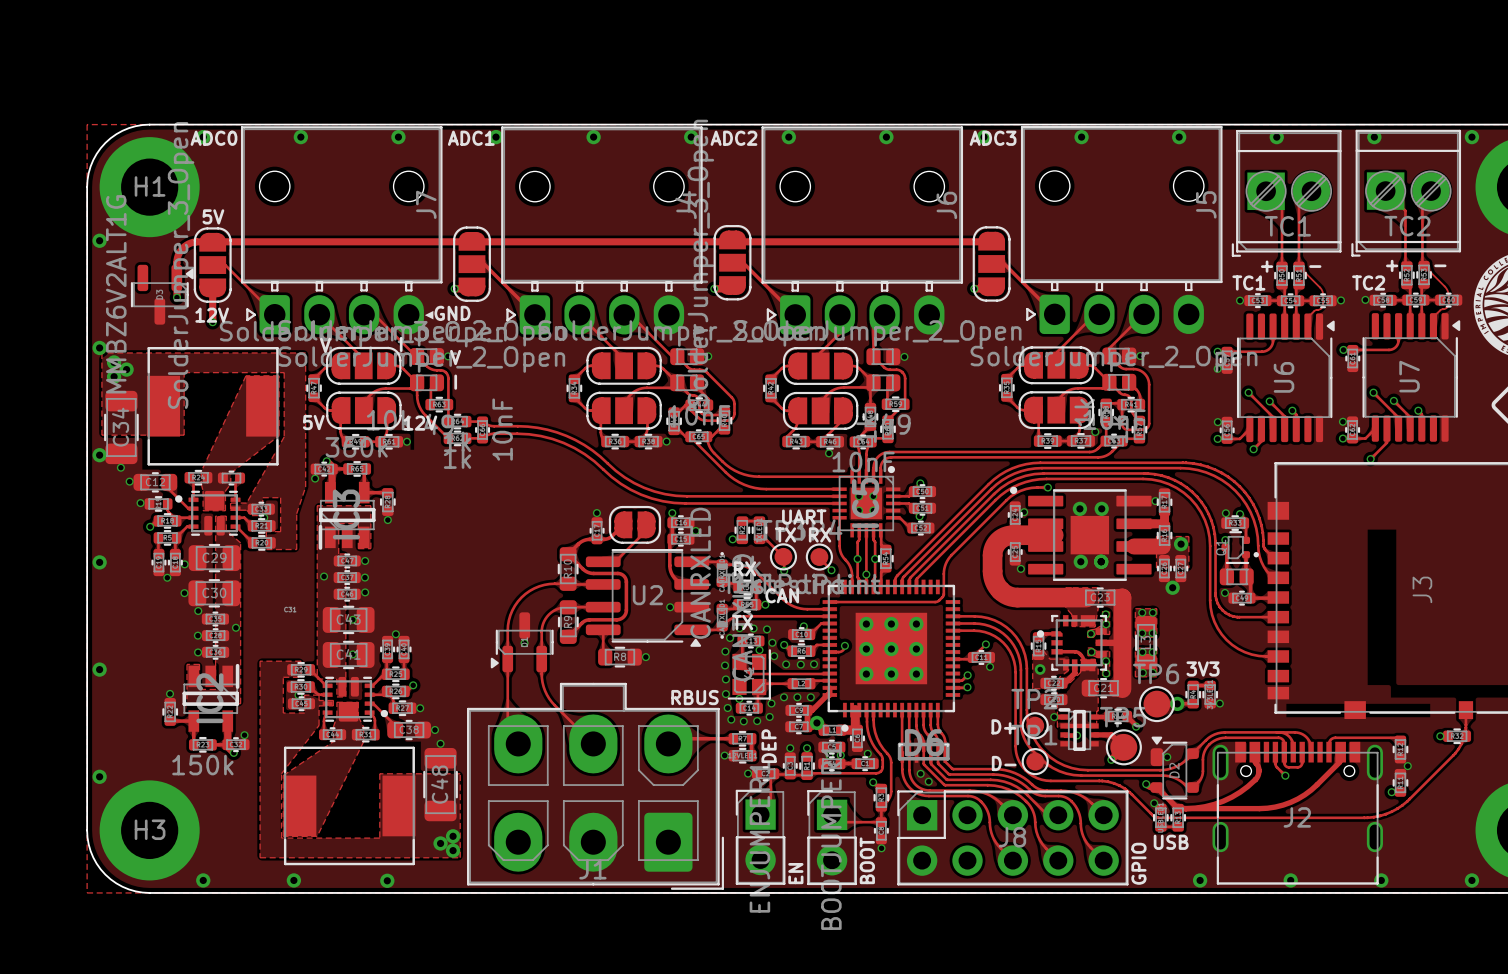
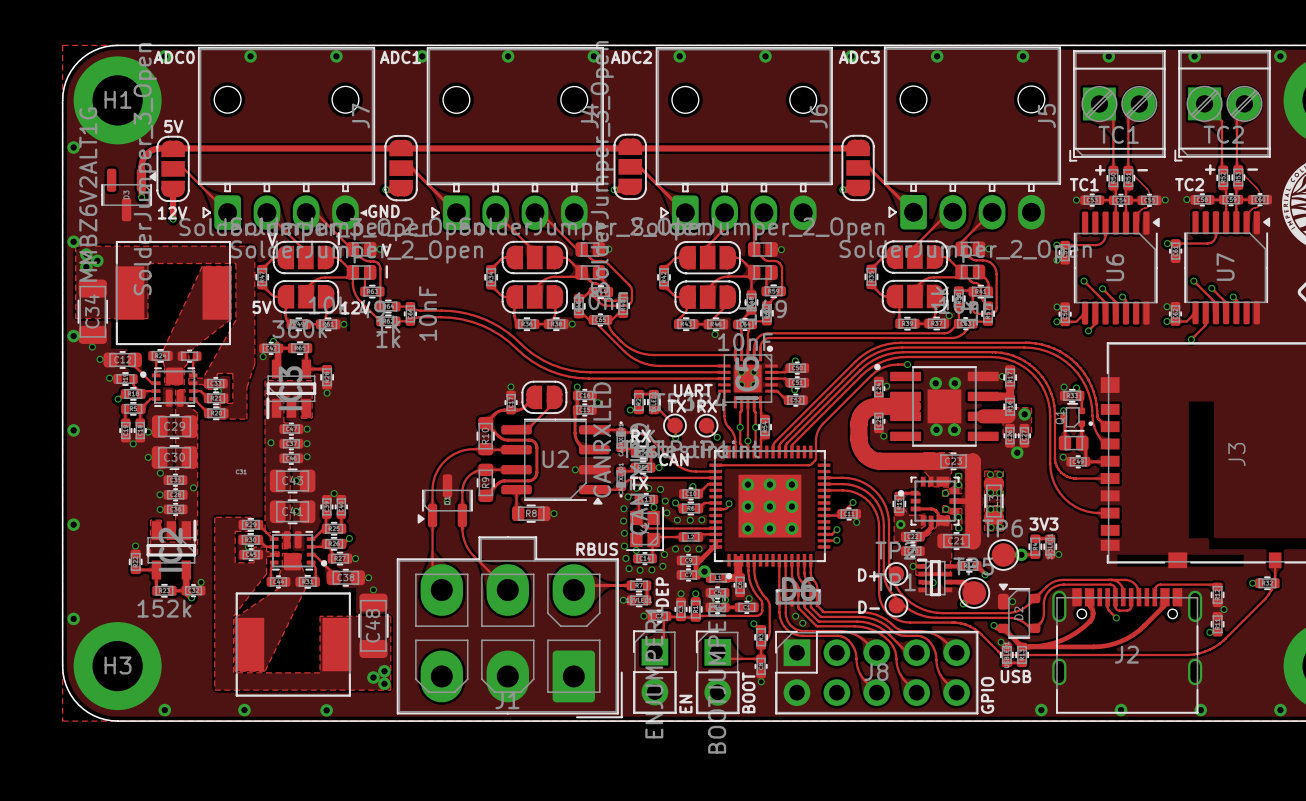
part value: 150k (202, 765) -> 152k (164, 608)

